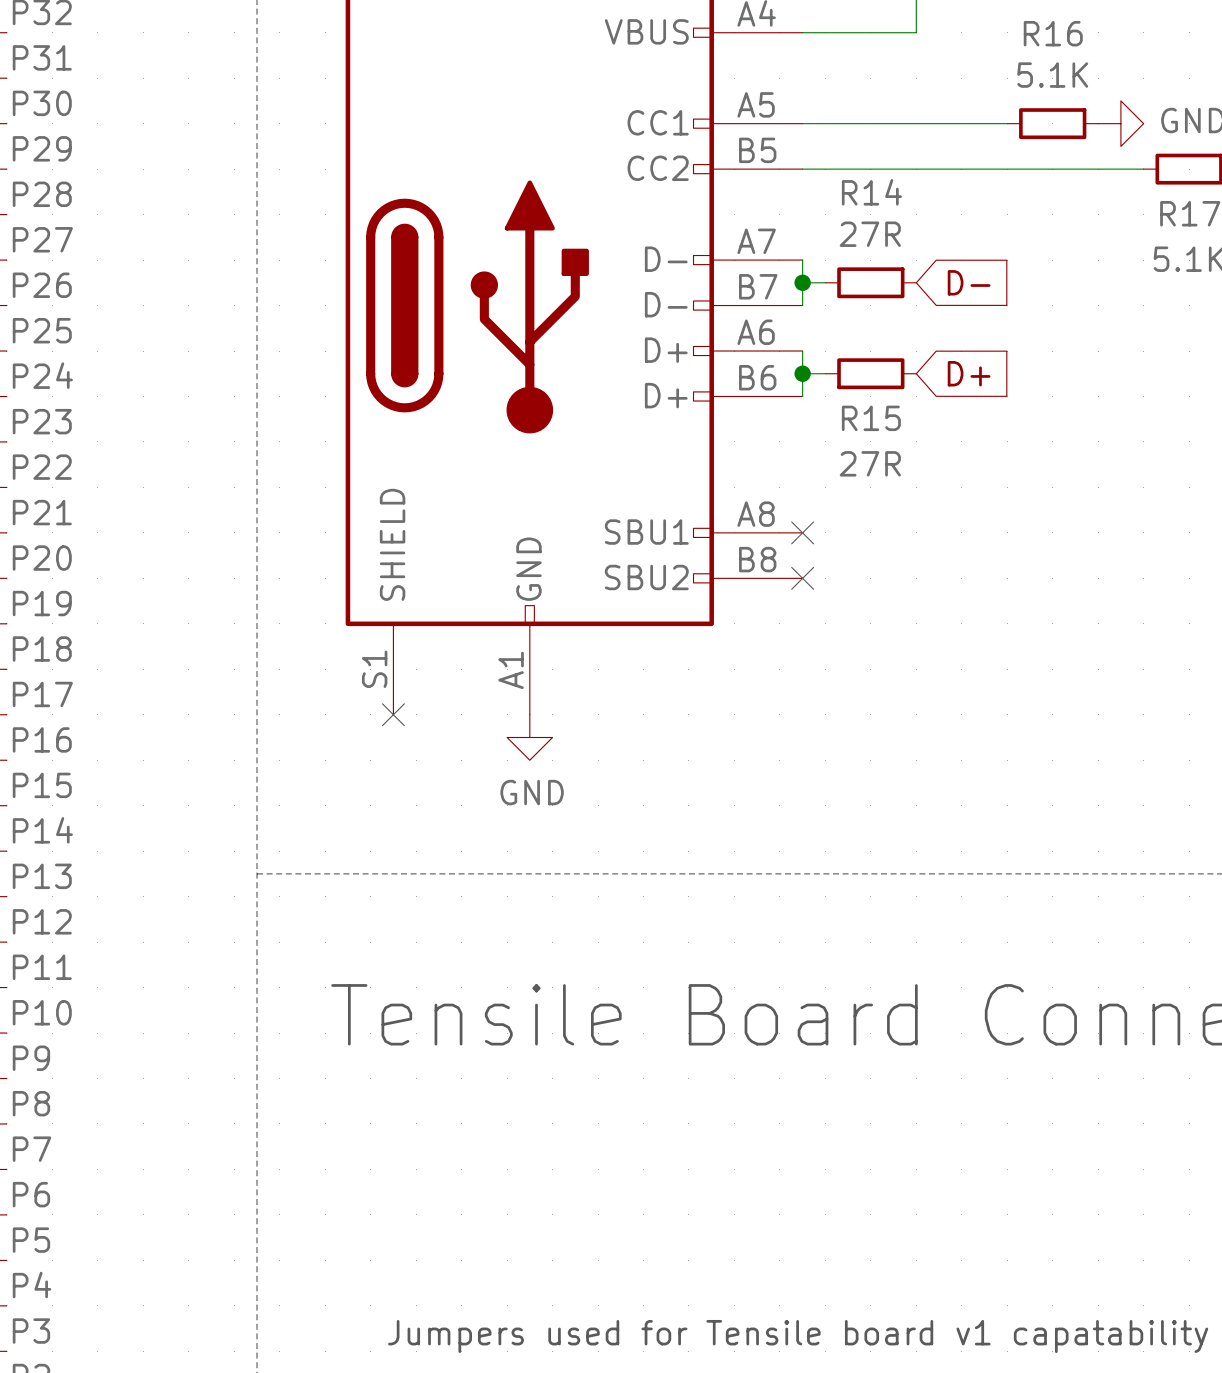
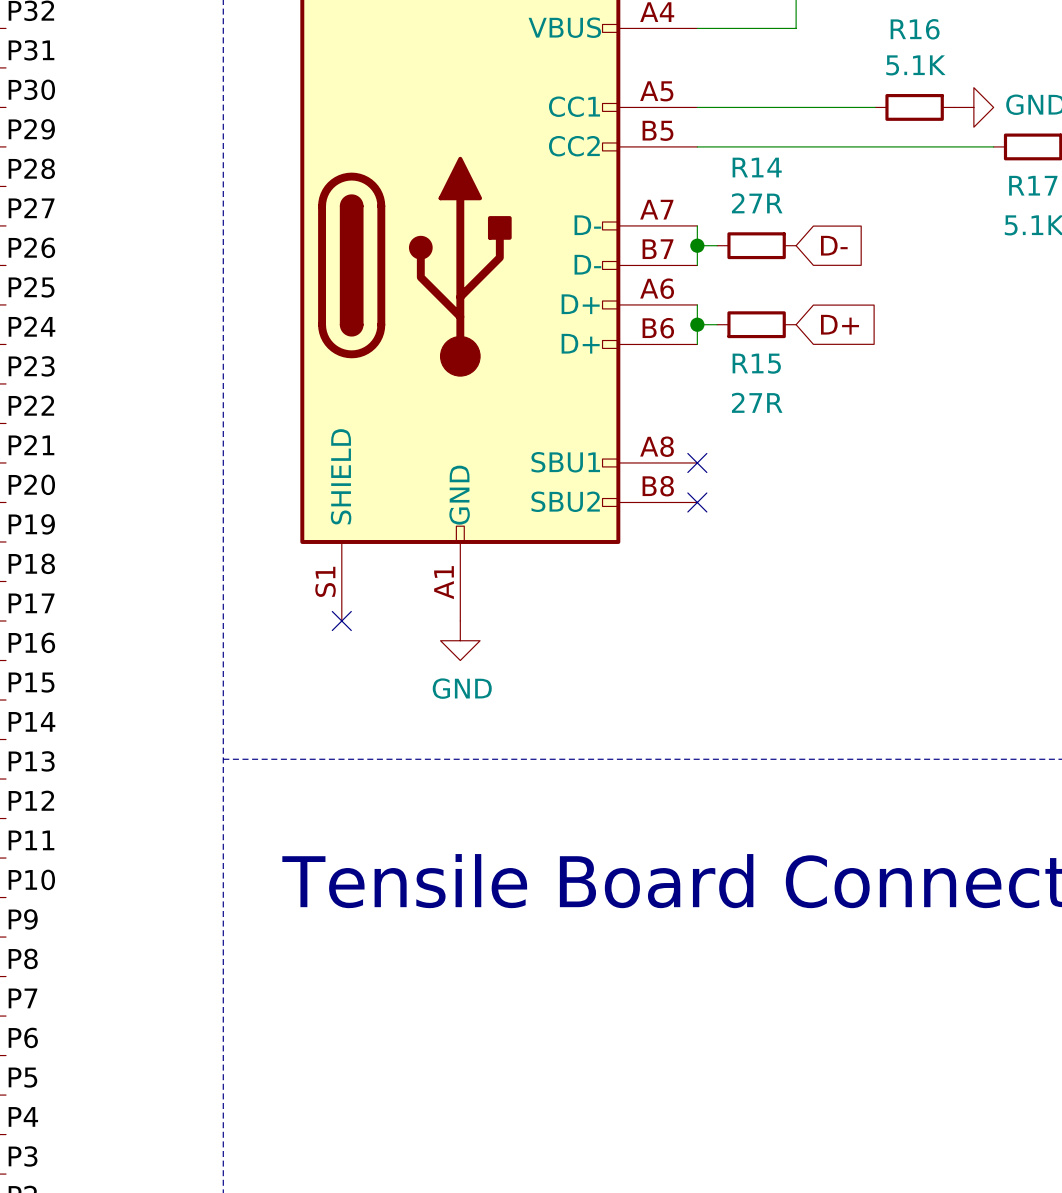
text: Jumpers used for Tensile board v1 capatability (798, 1336) -> none

